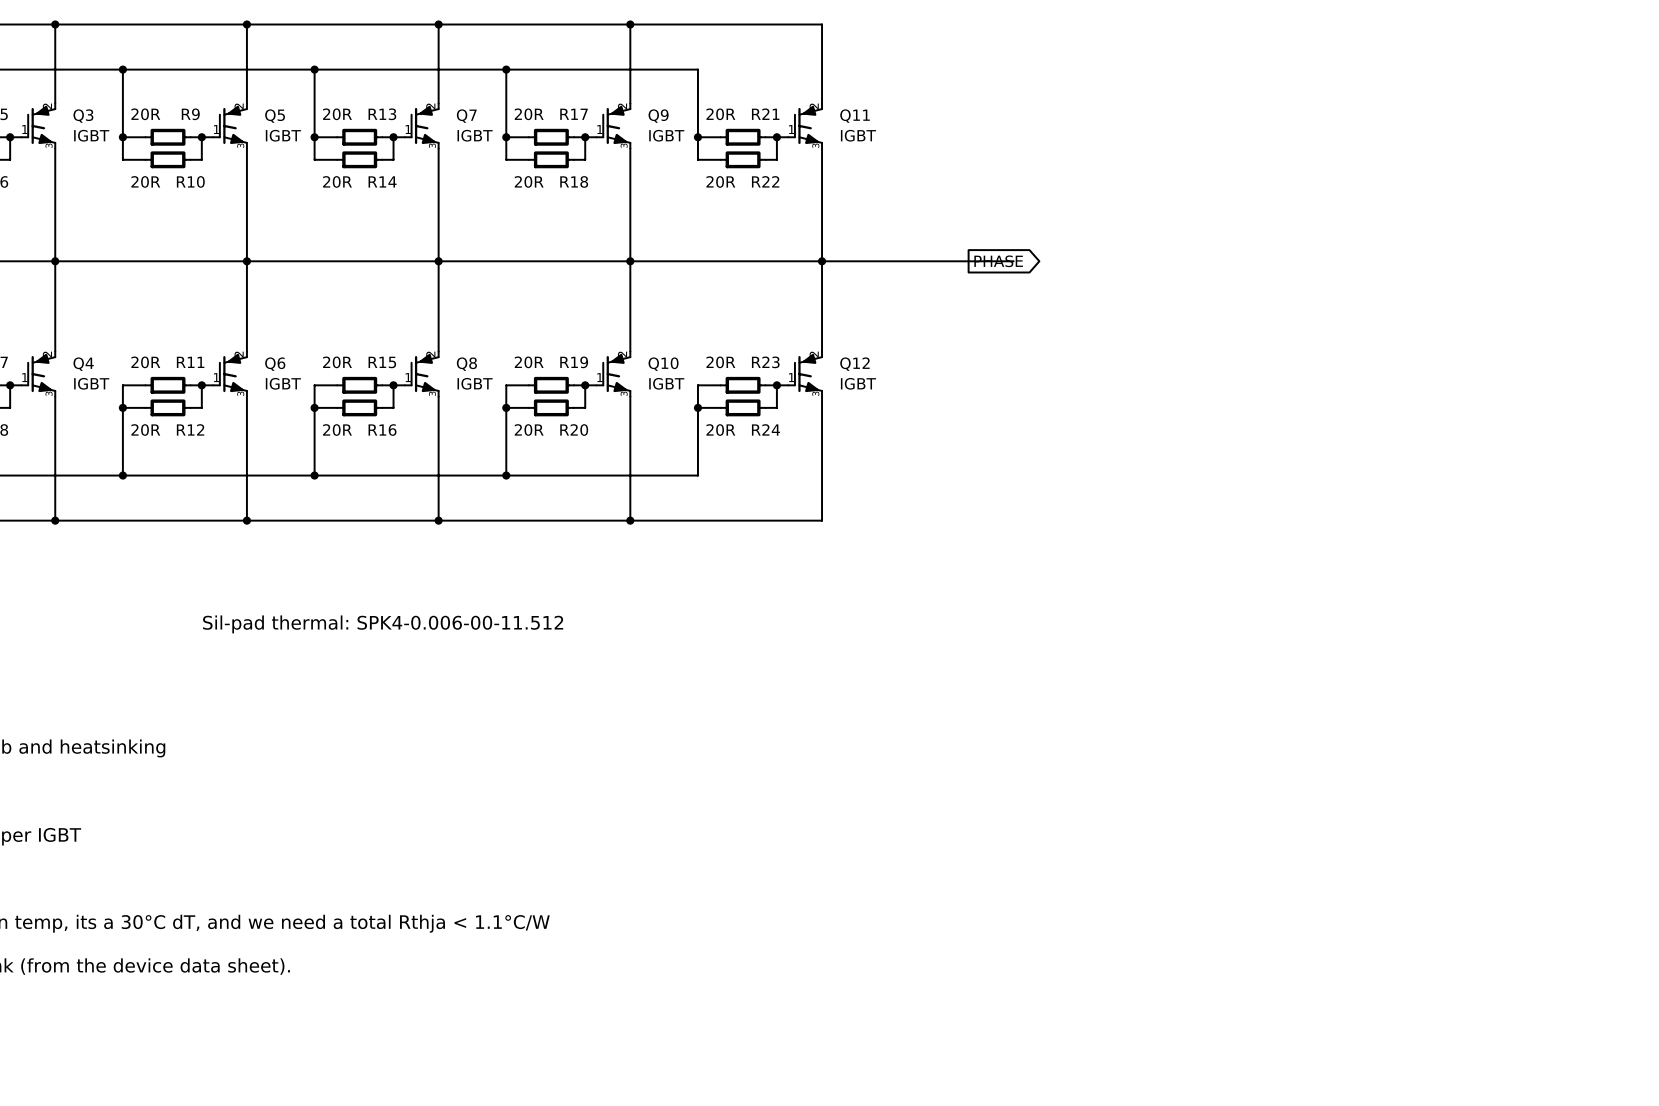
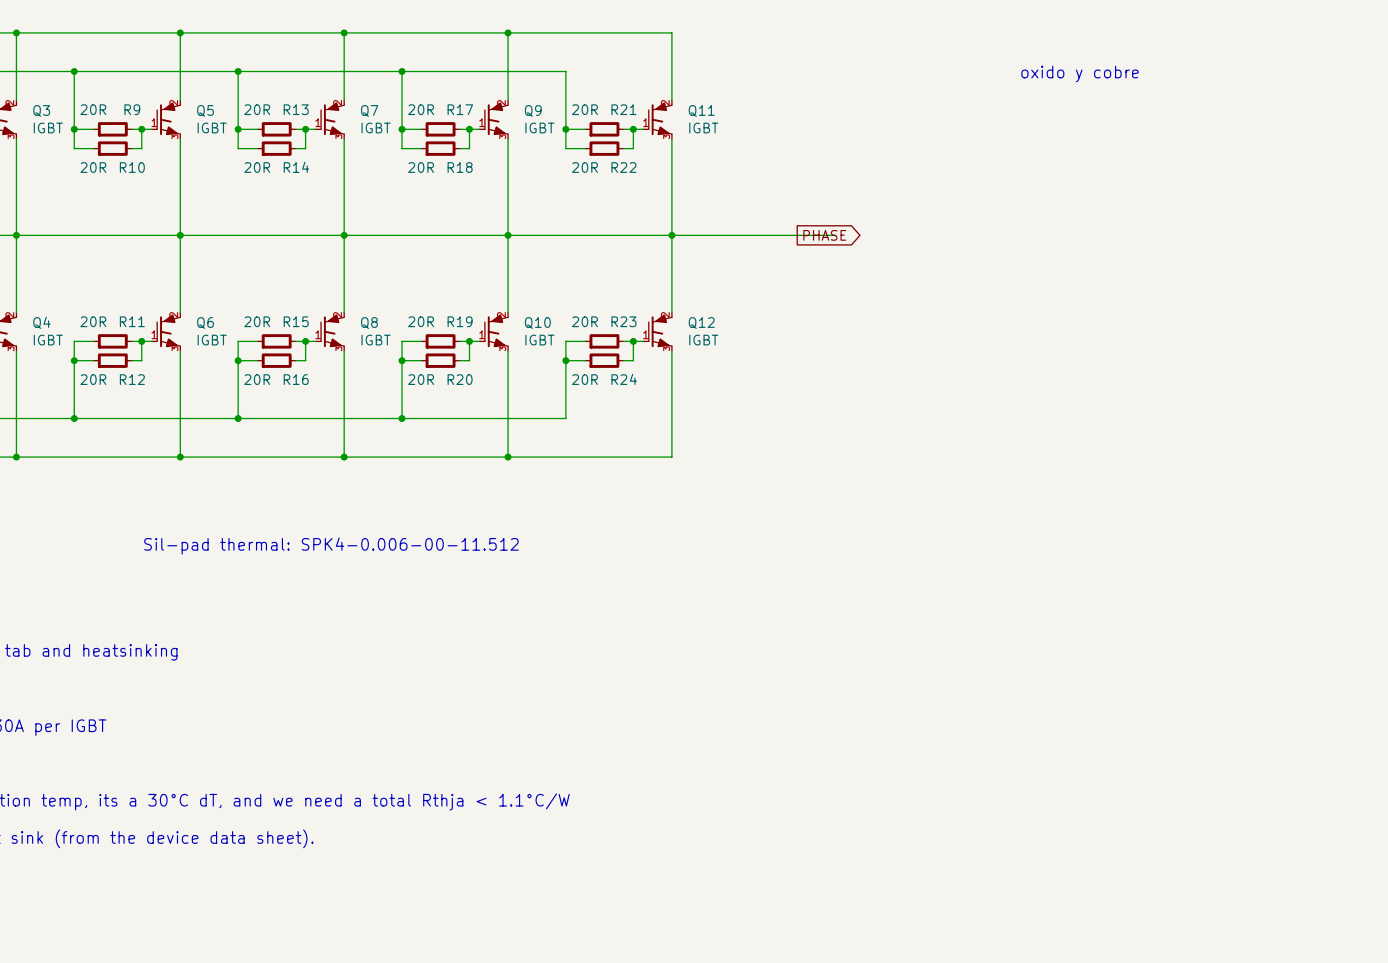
text: none -> oxido y cobre (1080, 73)

